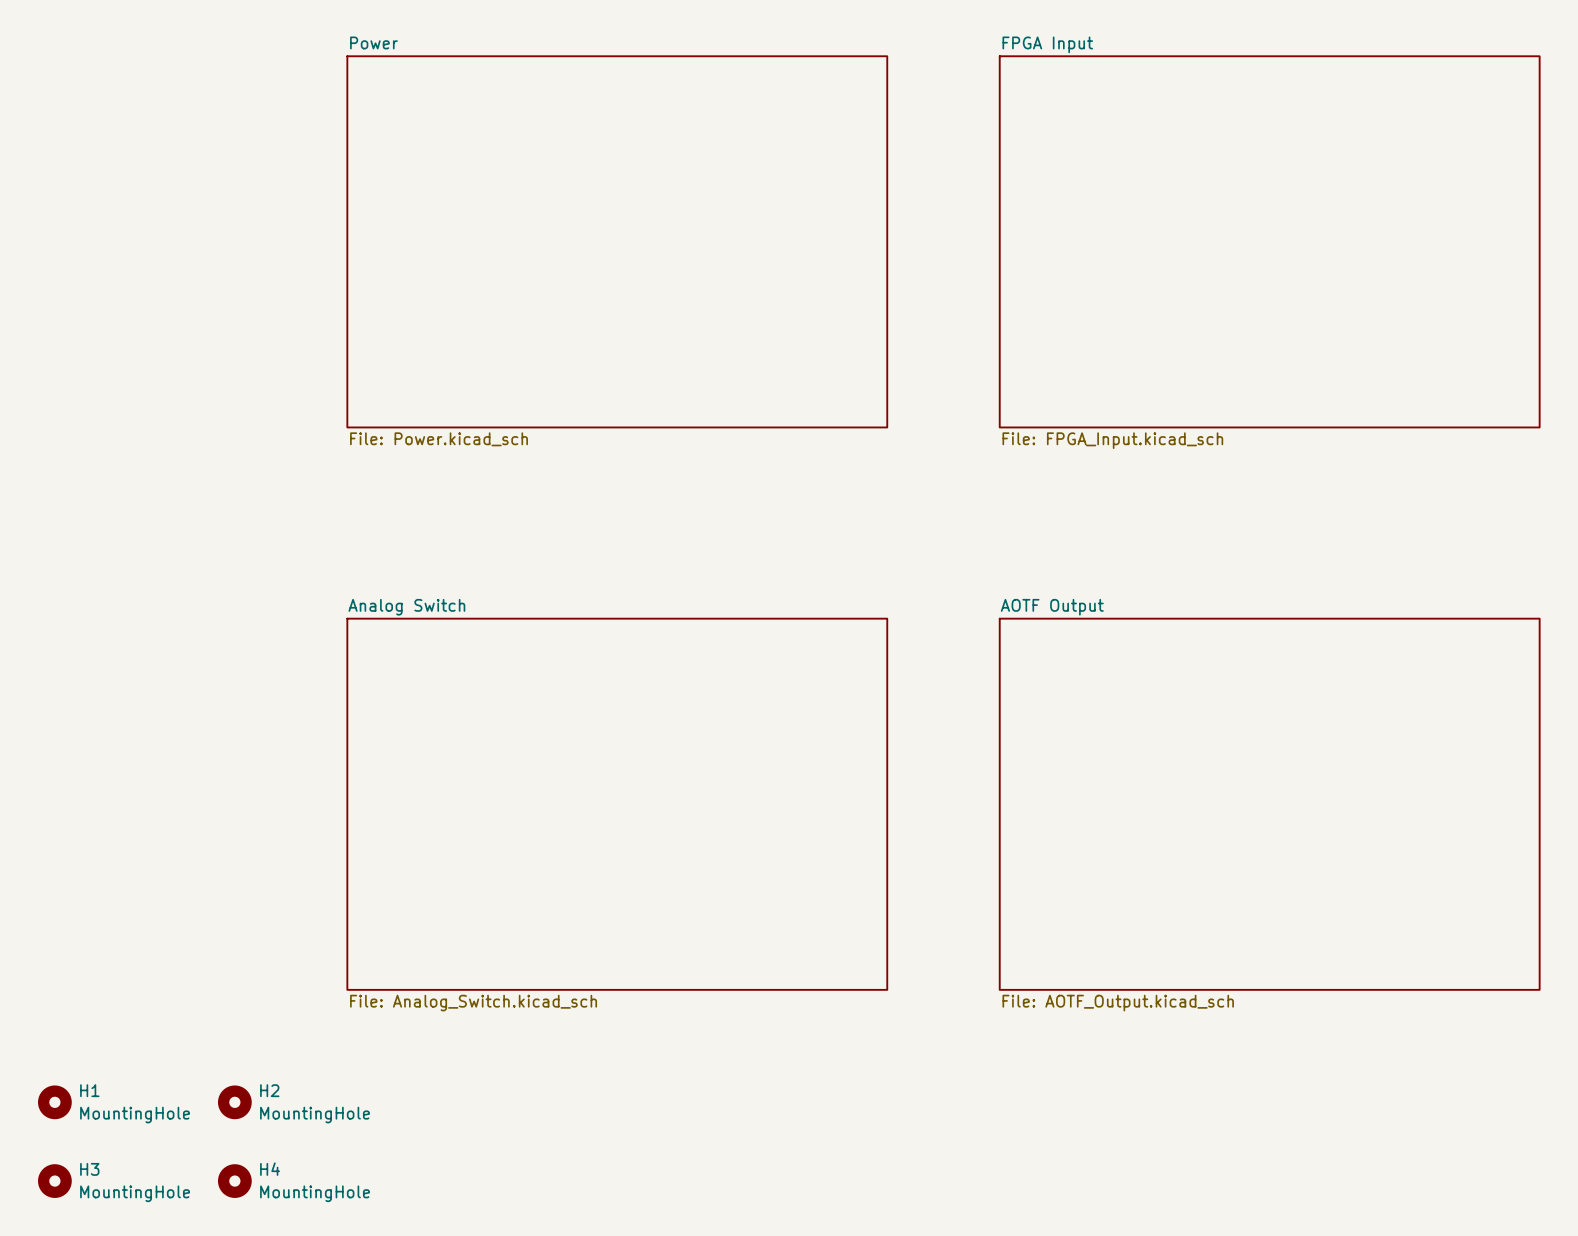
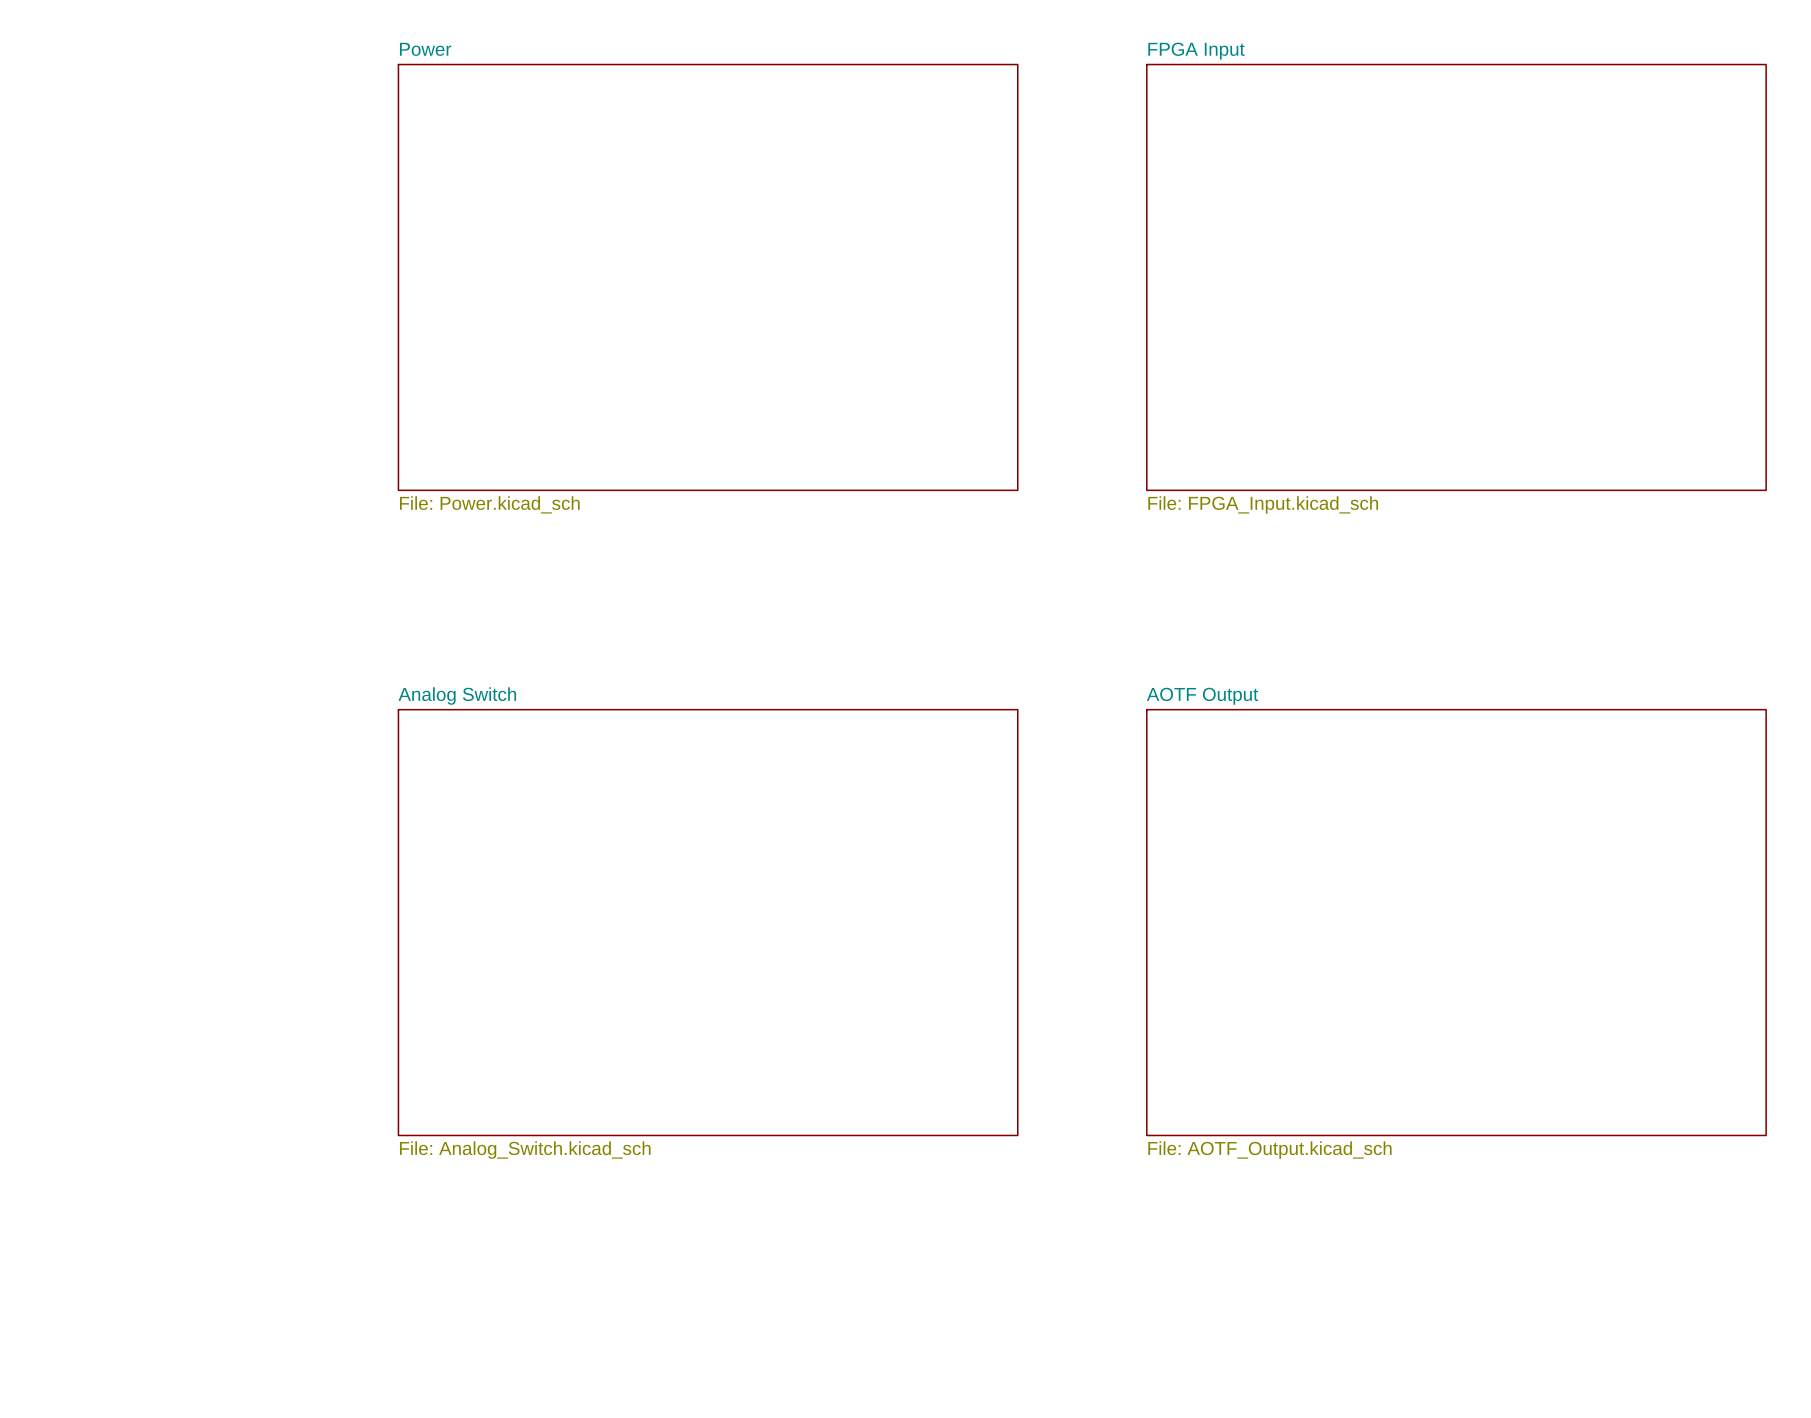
H1: MountingHole (54, 1102) -> none
H2: MountingHole (234, 1102) -> none
H3: MountingHole (54, 1181) -> none
H4: MountingHole (234, 1181) -> none

